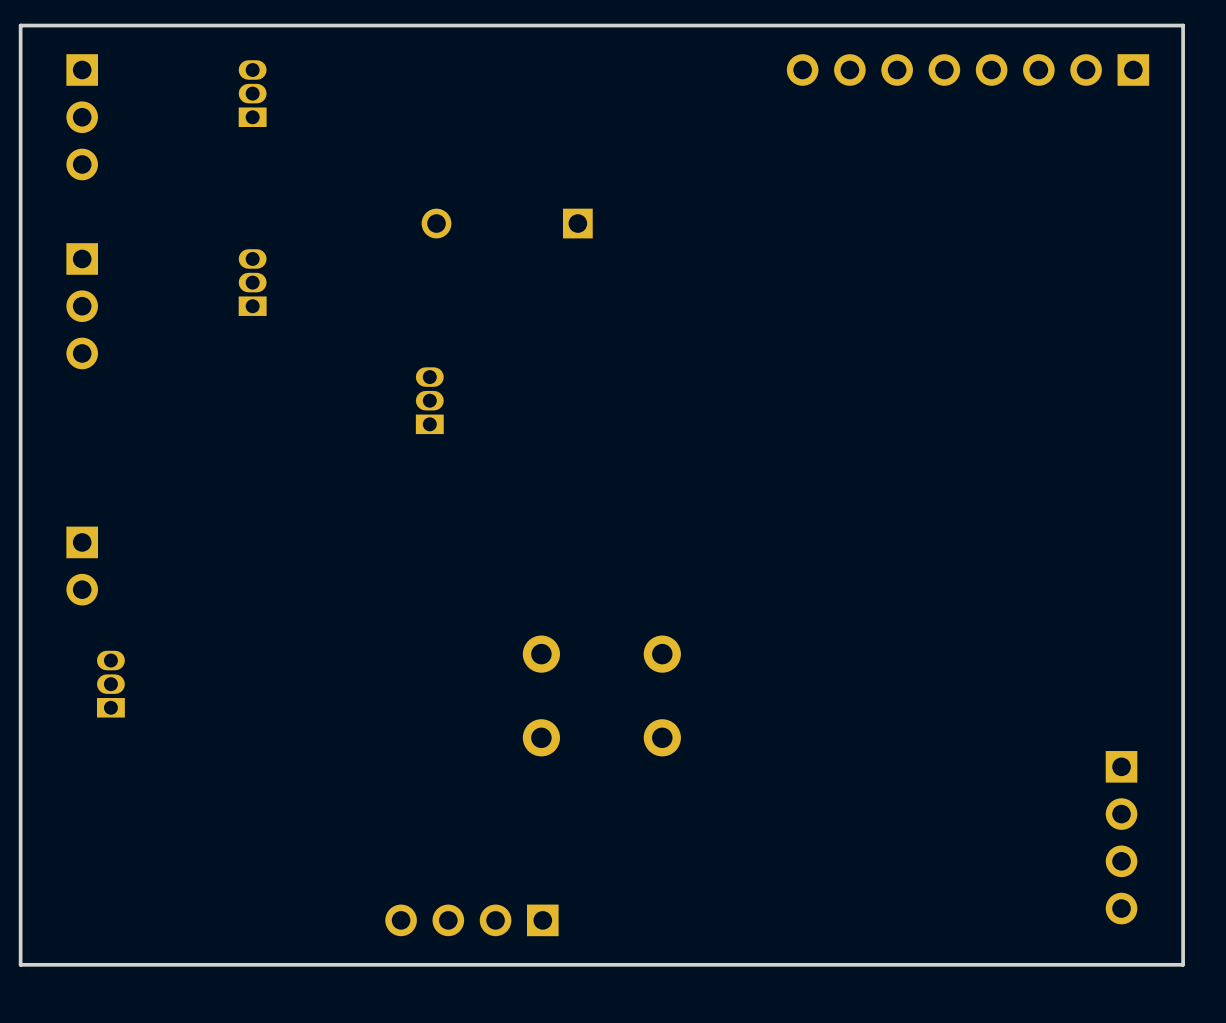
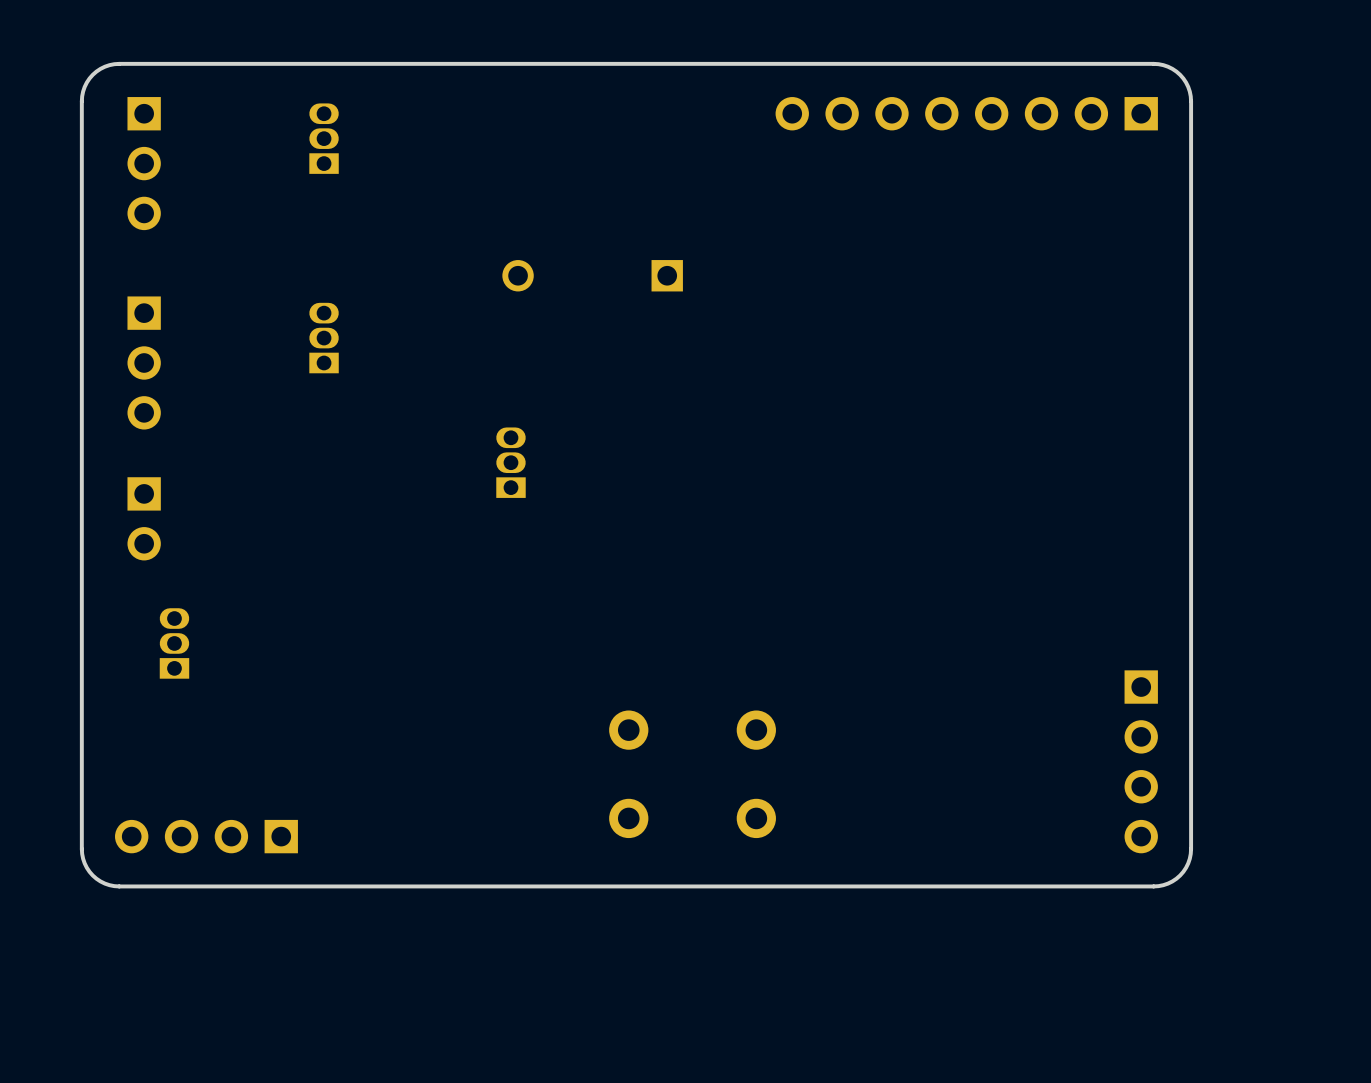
board edge: (1183, 25) (20, 25) (20, 964) (1183, 964) (1183, 25) -> (1153, 63) (1168, 66) (1180, 74) (1188, 86) (1191, 101) (1191, 849) (1186, 867) (1176, 878) (1163, 885) (1153, 886) (119, 886) (100, 881) (89, 871) (84, 863) (81, 849) (81, 101) (84, 86) (96, 71) (109, 65) (119, 63) (1153, 63)
part position: (967, 69) -> (966, 113)
part position: (82, 566) -> (144, 518)
part position: (110, 684) -> (174, 643)
part: none -> (206, 836)
part position: (1121, 837) -> (1141, 761)
part: (471, 920) -> none

